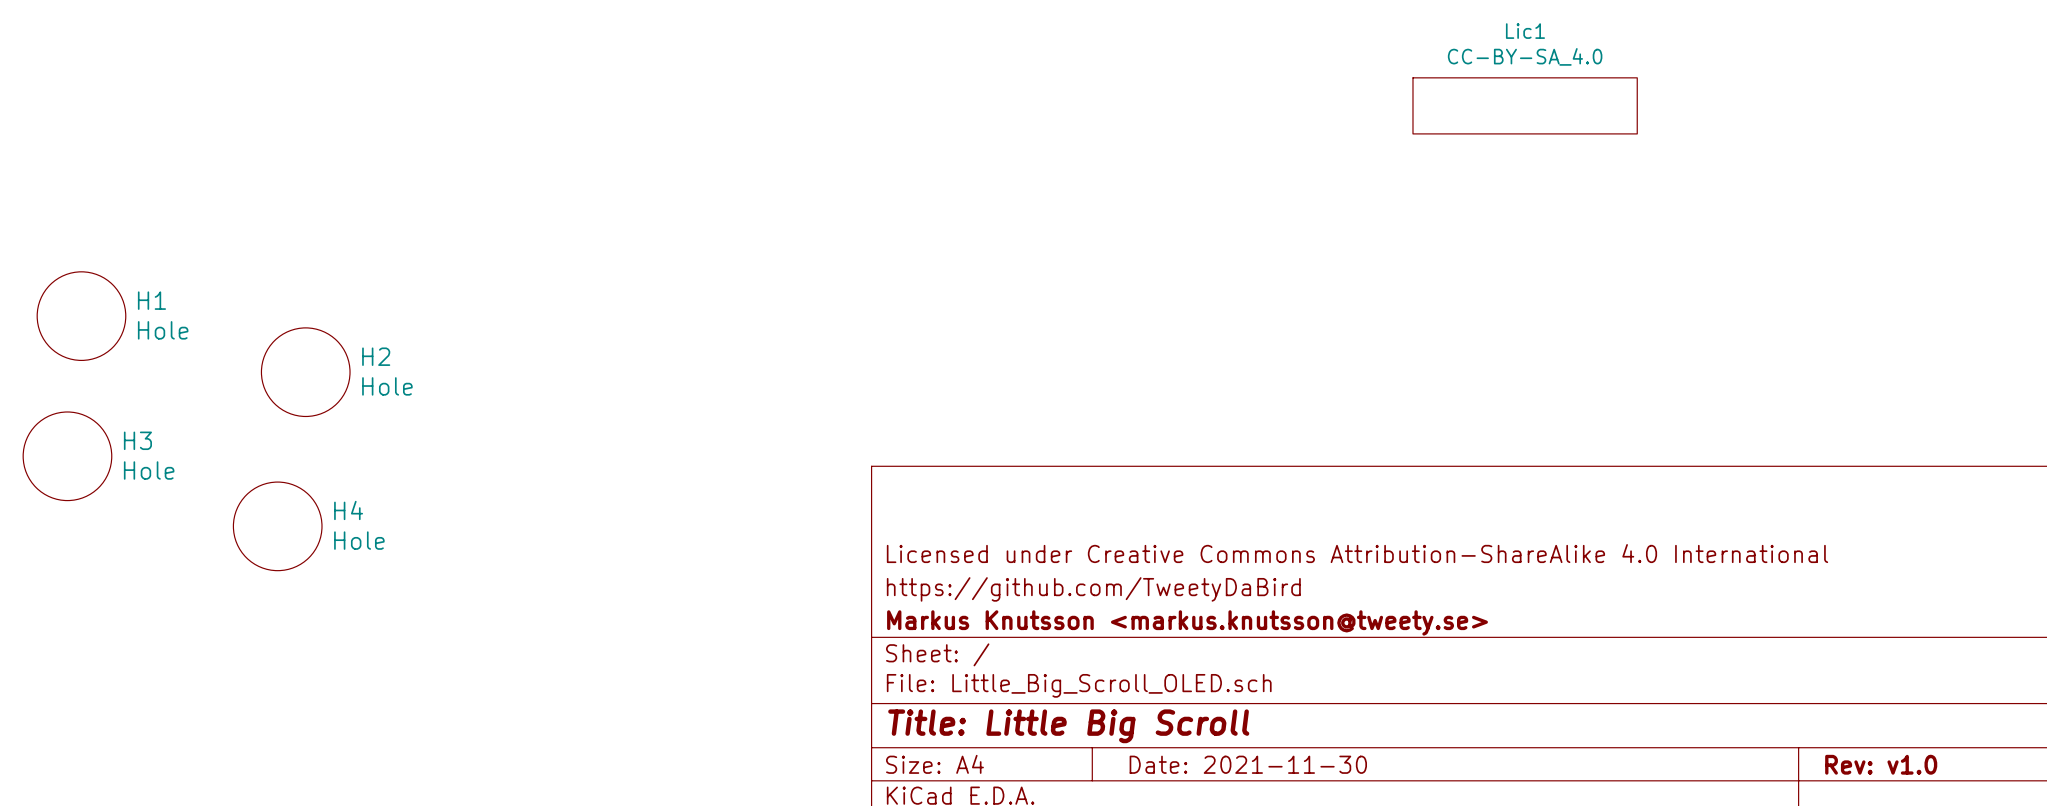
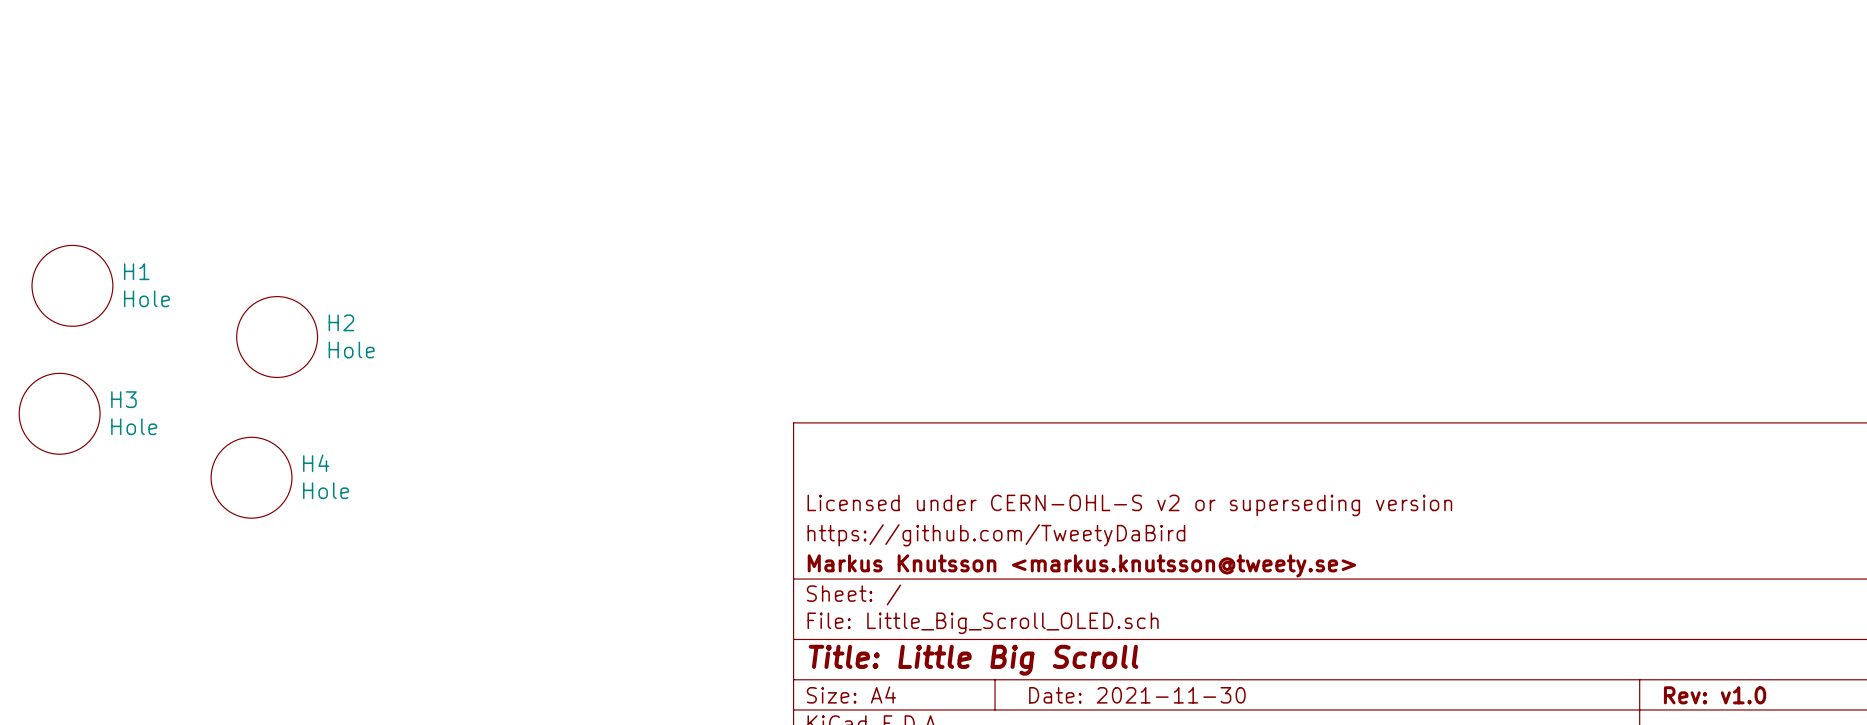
Lic1: CC-BY-SA_4.0 (1525, 105) -> none
title block: Licensed under Creative Commons Attribution-ShareAlike 4.0 International (1357, 553) -> Licensed under CERN-OHL-S v2 or superseding version (1129, 505)

